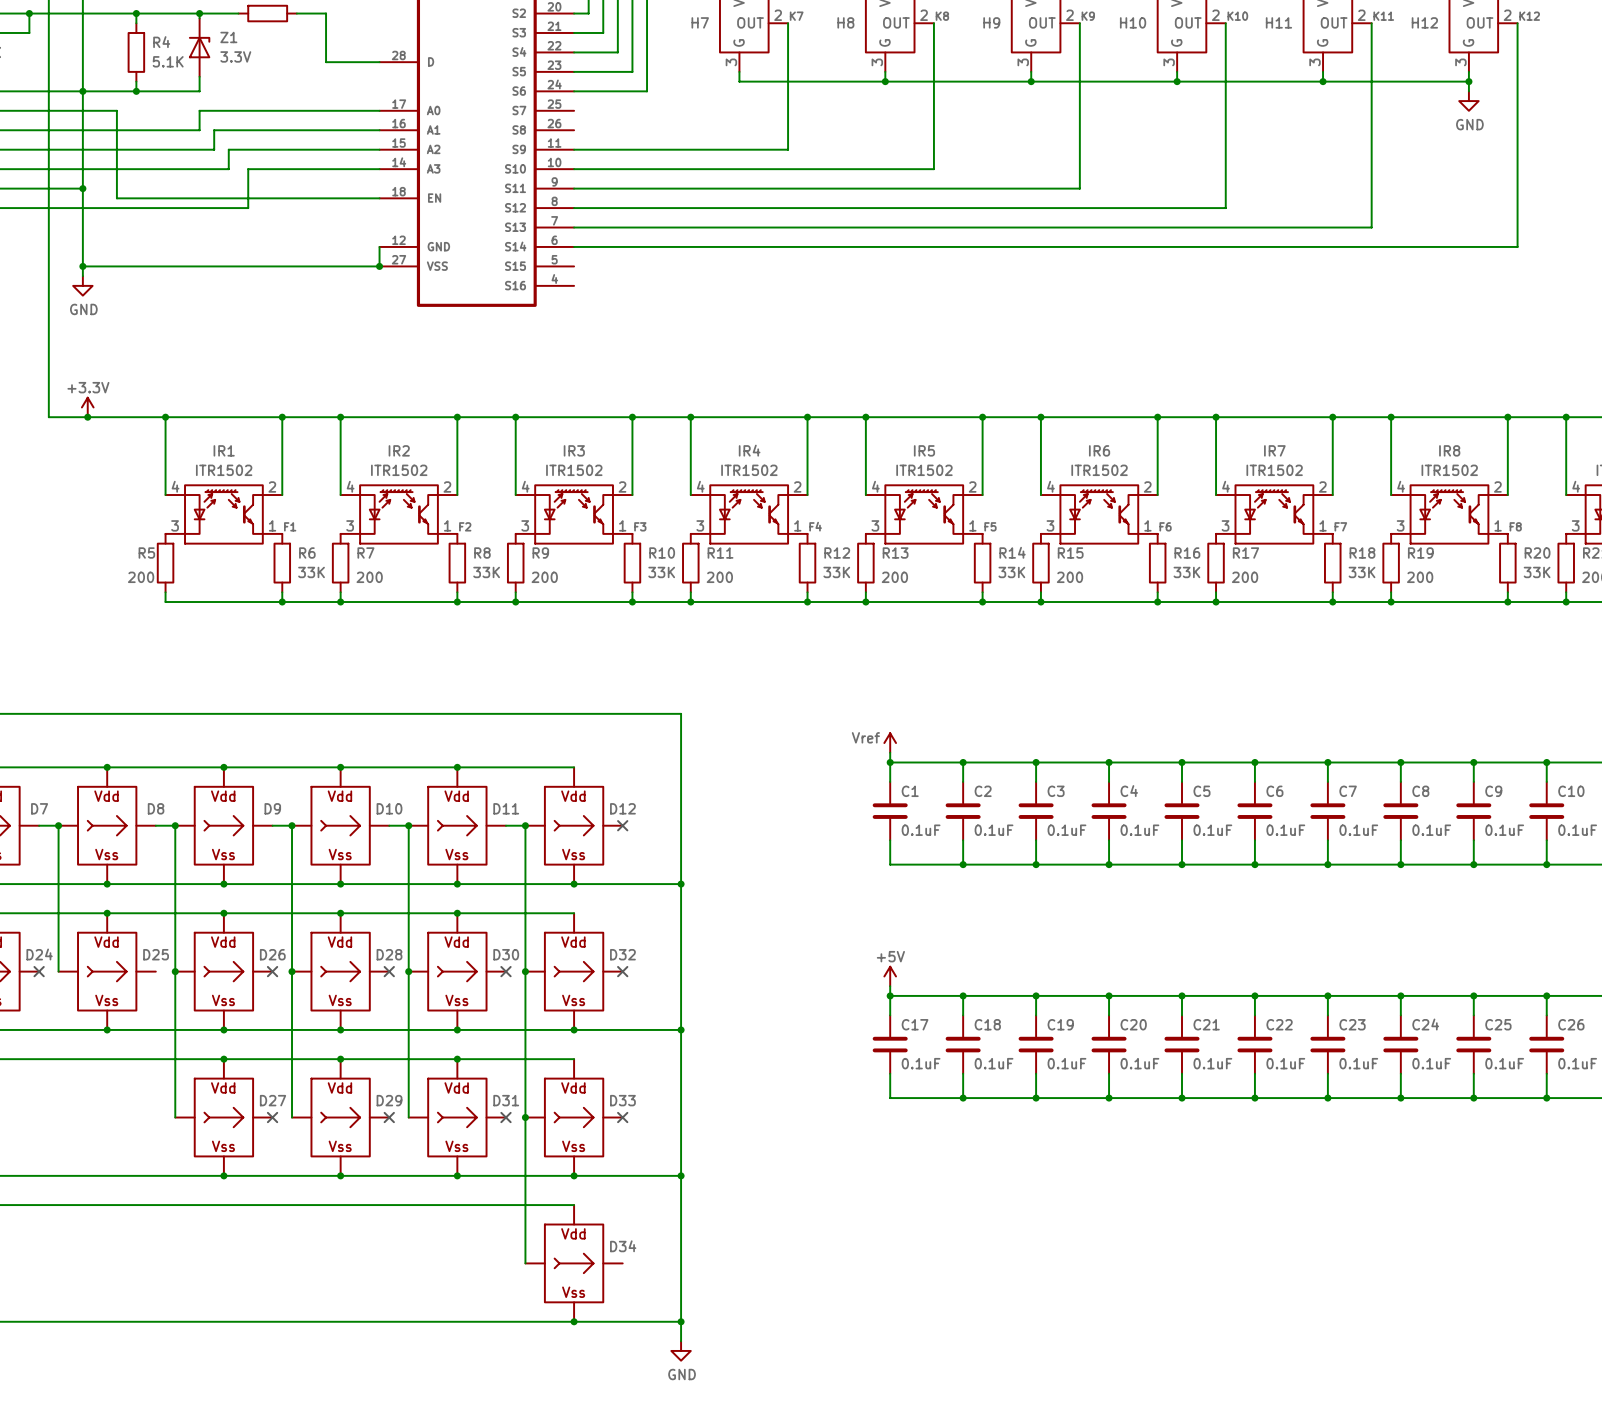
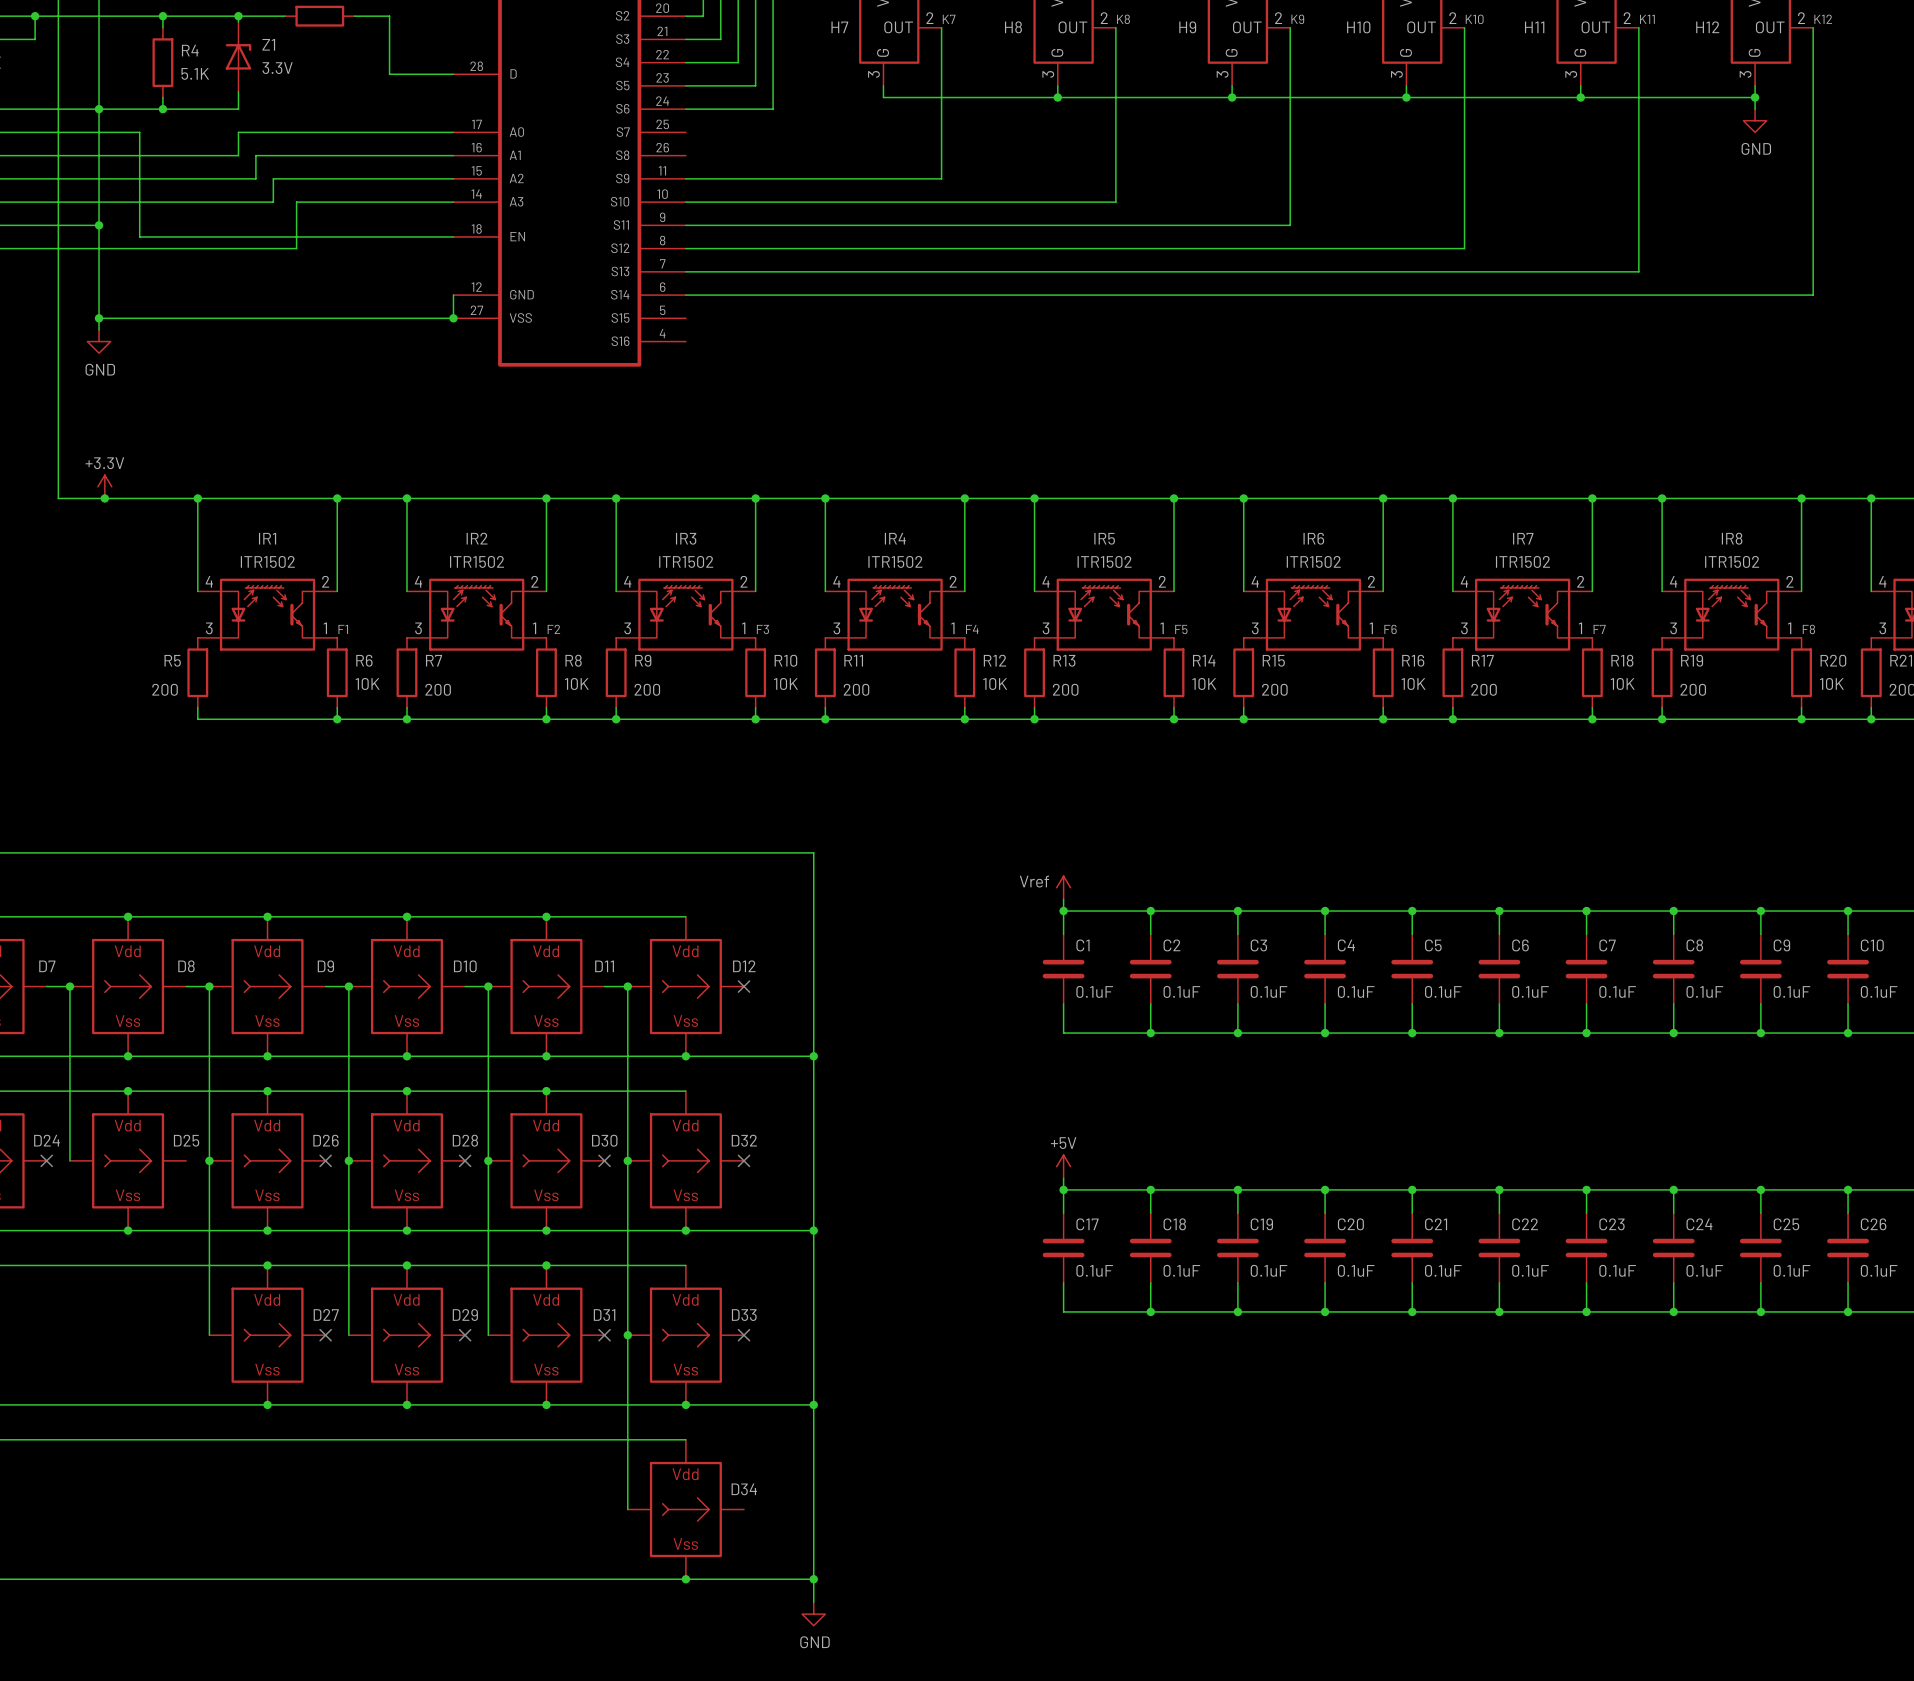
R6 value: 33K (311, 572) -> 10K (367, 683)
R8 value: 33K (486, 572) -> 10K (576, 683)
R10 value: 33K (661, 572) -> 10K (785, 683)
R12 value: 33K (836, 572) -> 10K (995, 683)
R14 value: 33K (1011, 572) -> 10K (1204, 683)
R16 value: 33K (1186, 572) -> 10K (1413, 683)
R18 value: 33K (1362, 572) -> 10K (1622, 683)
R20 value: 33K (1537, 572) -> 10K (1831, 683)

